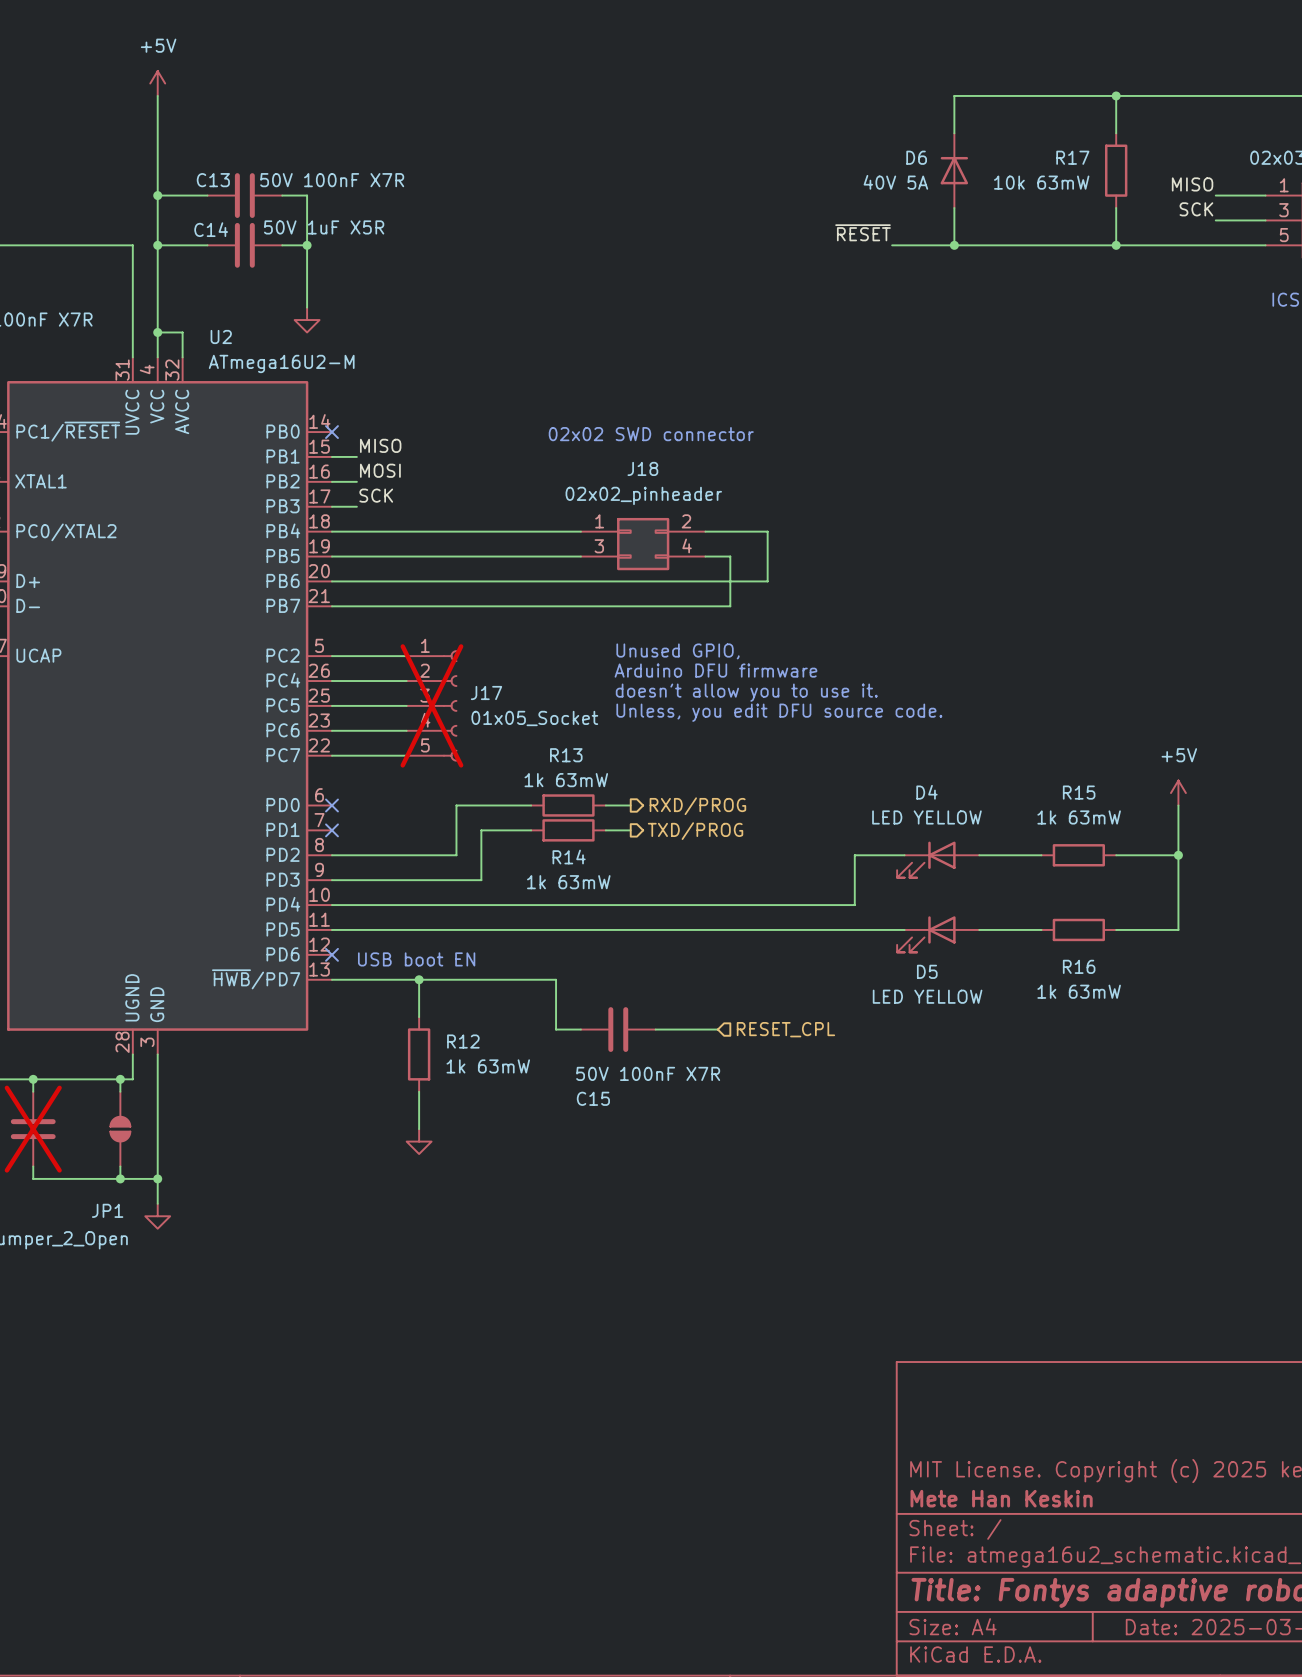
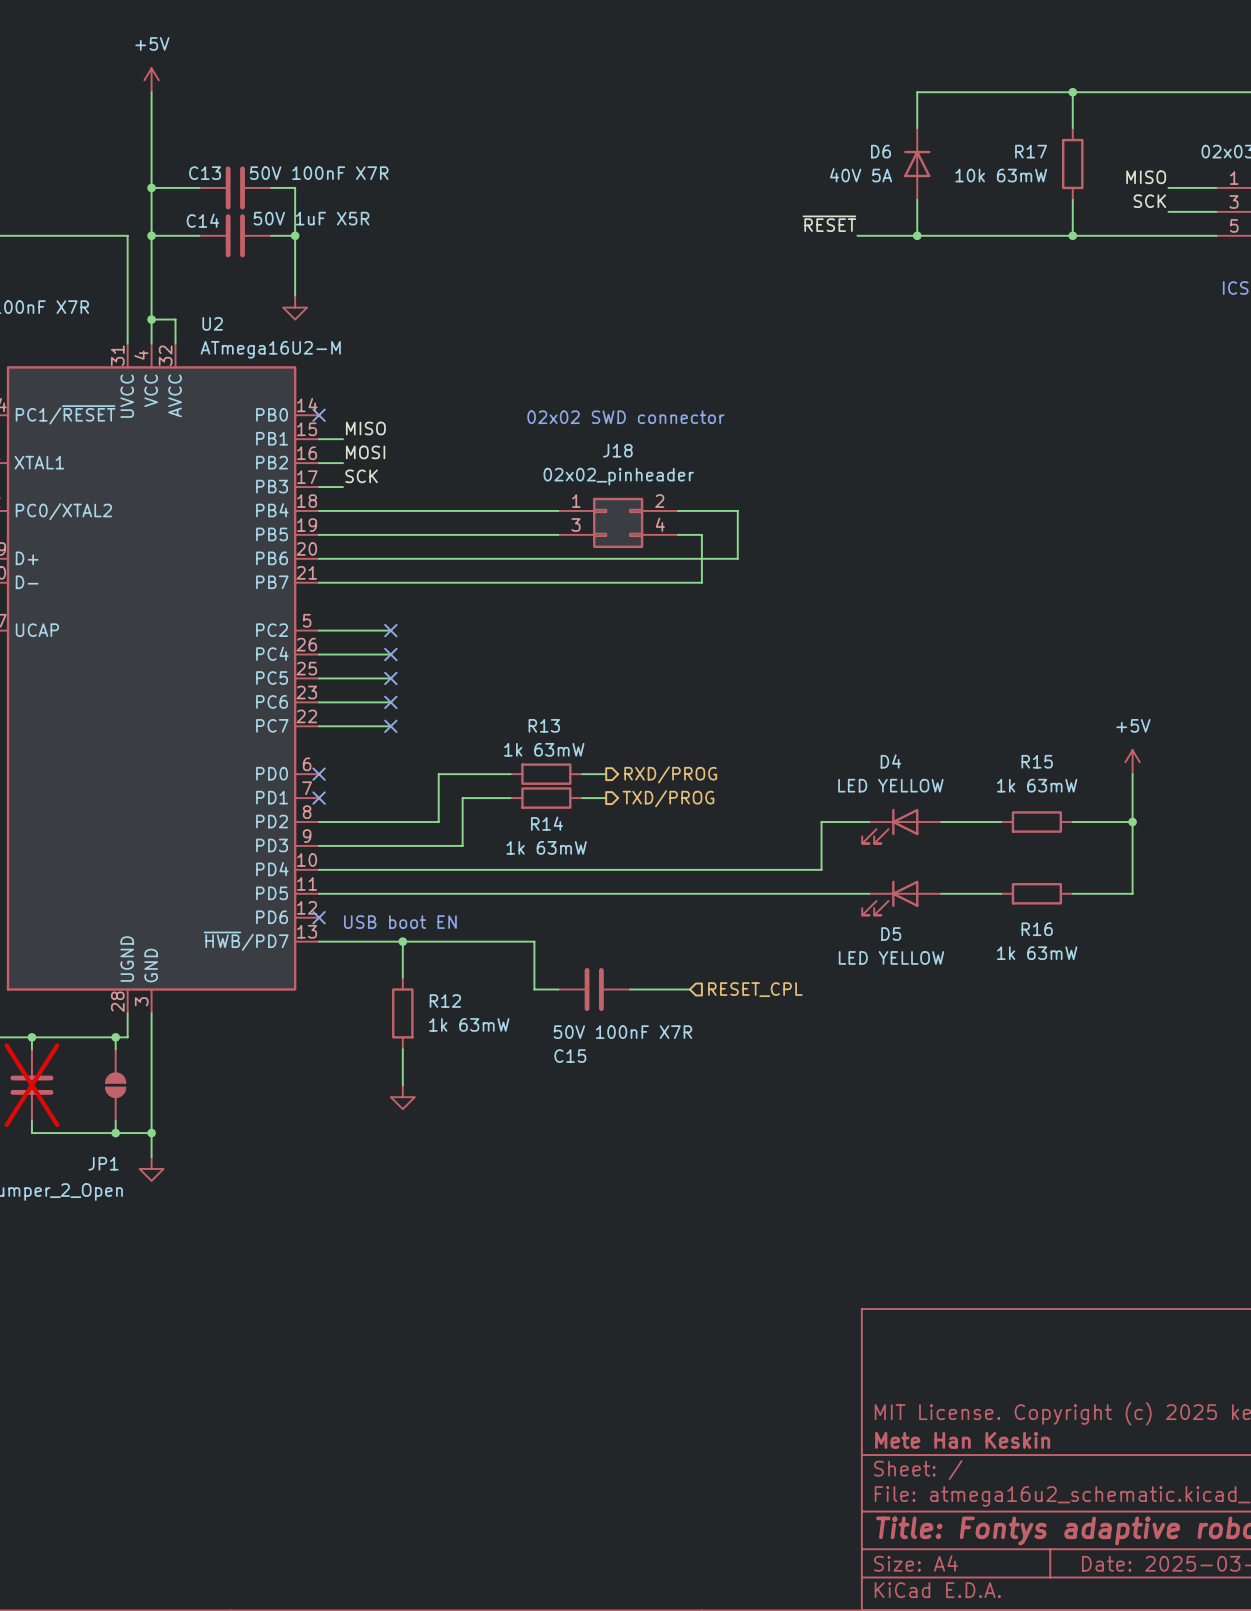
text: Unused GPIO, (678, 651) -> none
no-connect mark: none -> (390, 630)
text: Arduino DFU firmware (715, 670) -> none
no-connect mark: none -> (390, 654)
text: doesn't allow you to use it. (746, 692) -> none
no-connect mark: none -> (390, 678)
J17: 01x05_Socket (431, 705) -> none
text: Unless, you edit DFU source code. (779, 712) -> none
no-connect mark: none -> (390, 702)
no-connect mark: none -> (390, 726)

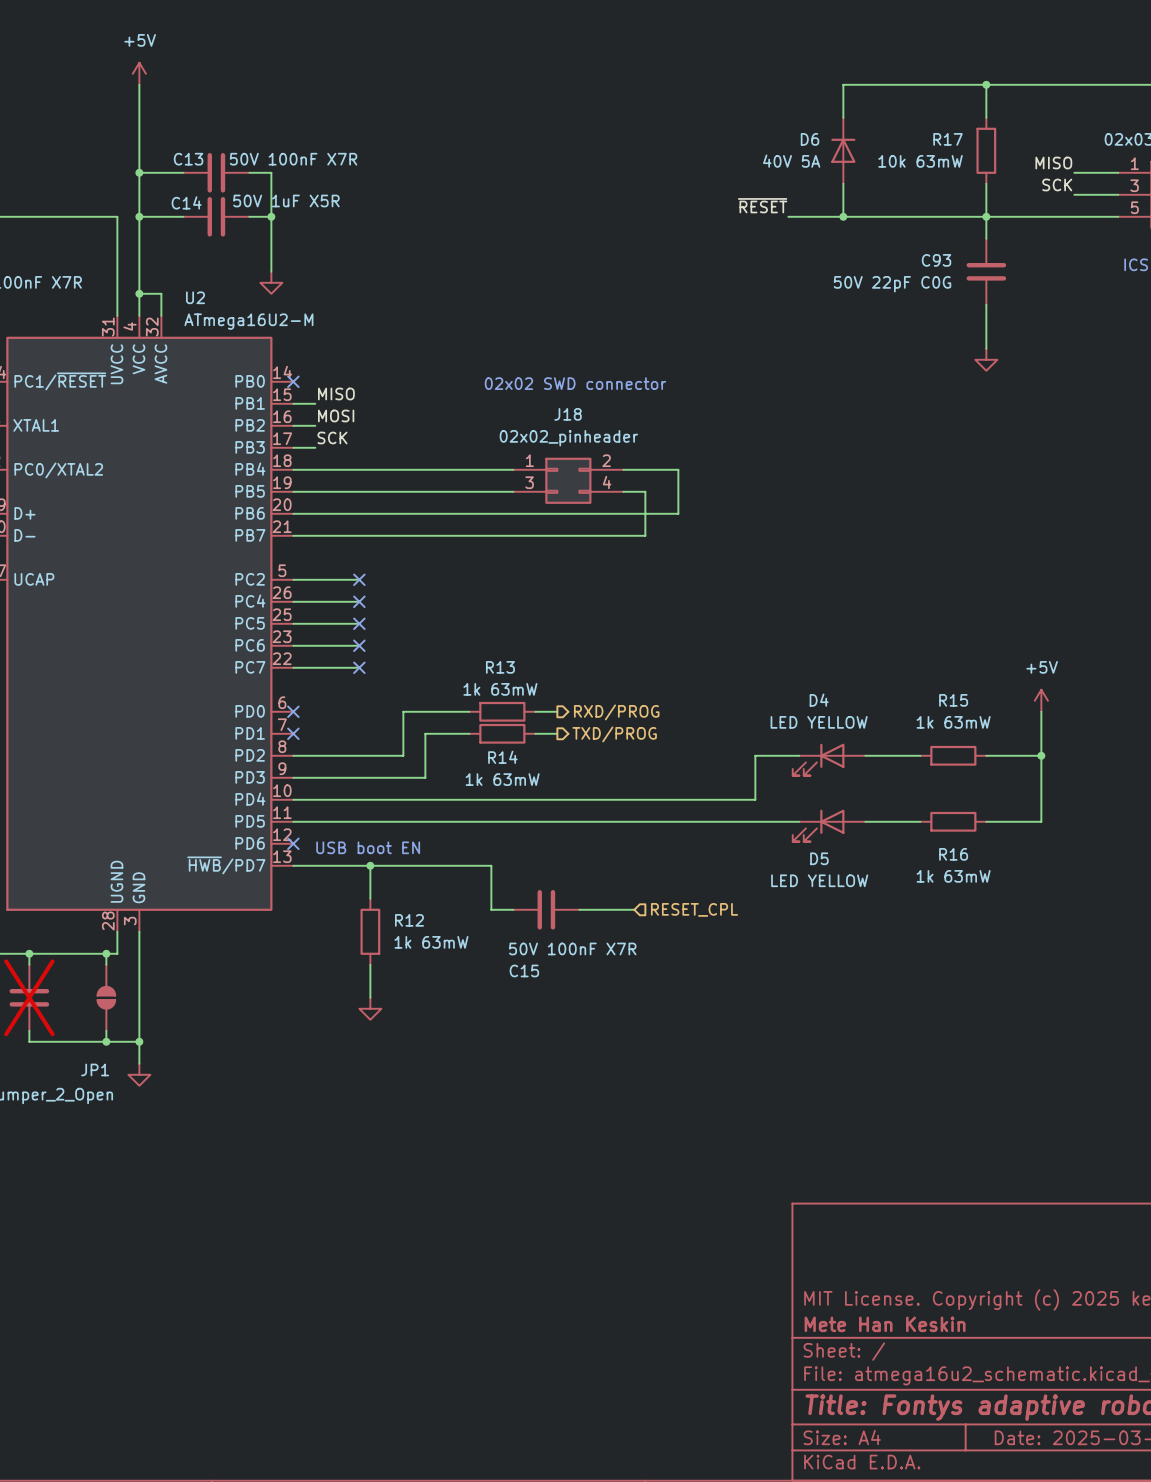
wire: none -> (986, 216) (986, 238)
C93: none -> 50V 22pF C0G (986, 271)
wire: none -> (986, 304) (986, 348)
power symbol: none -> (986, 359)

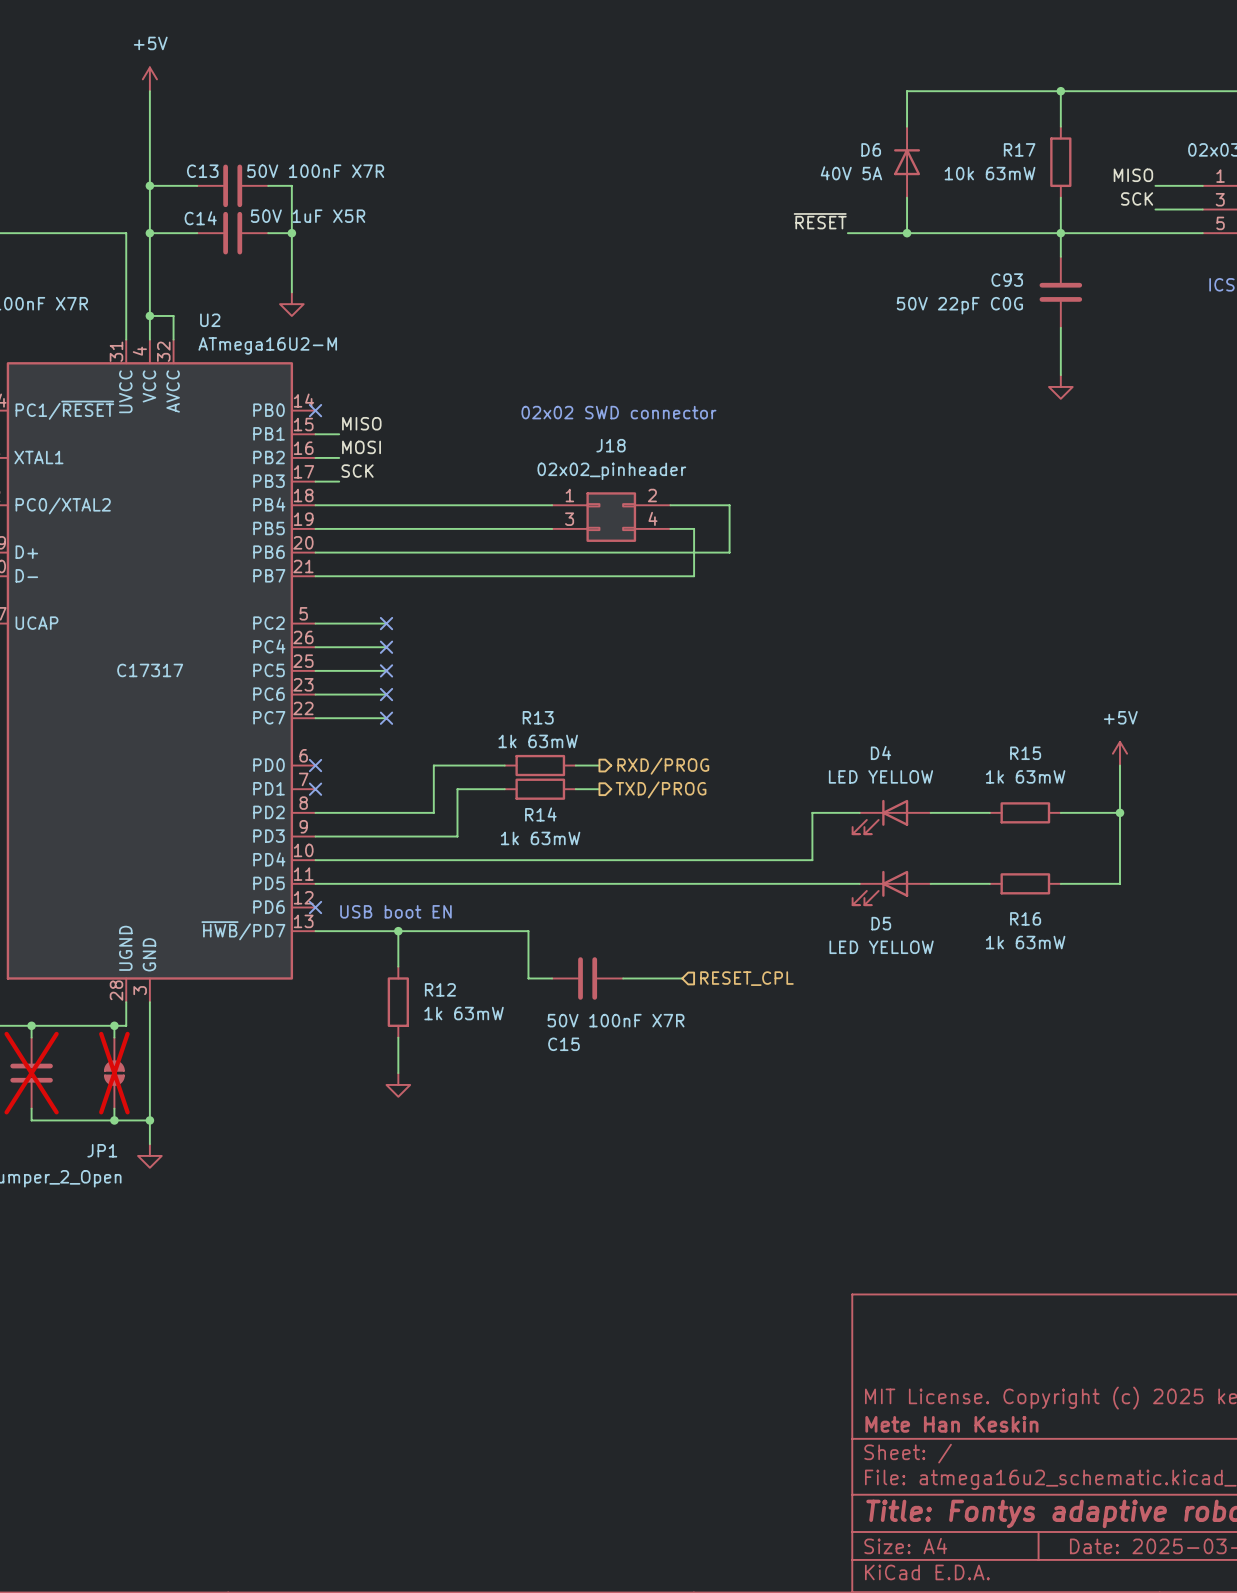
U2 text: none -> C17317 (150, 670)
JP1 do-not-place cross: none -> (114, 1073)

